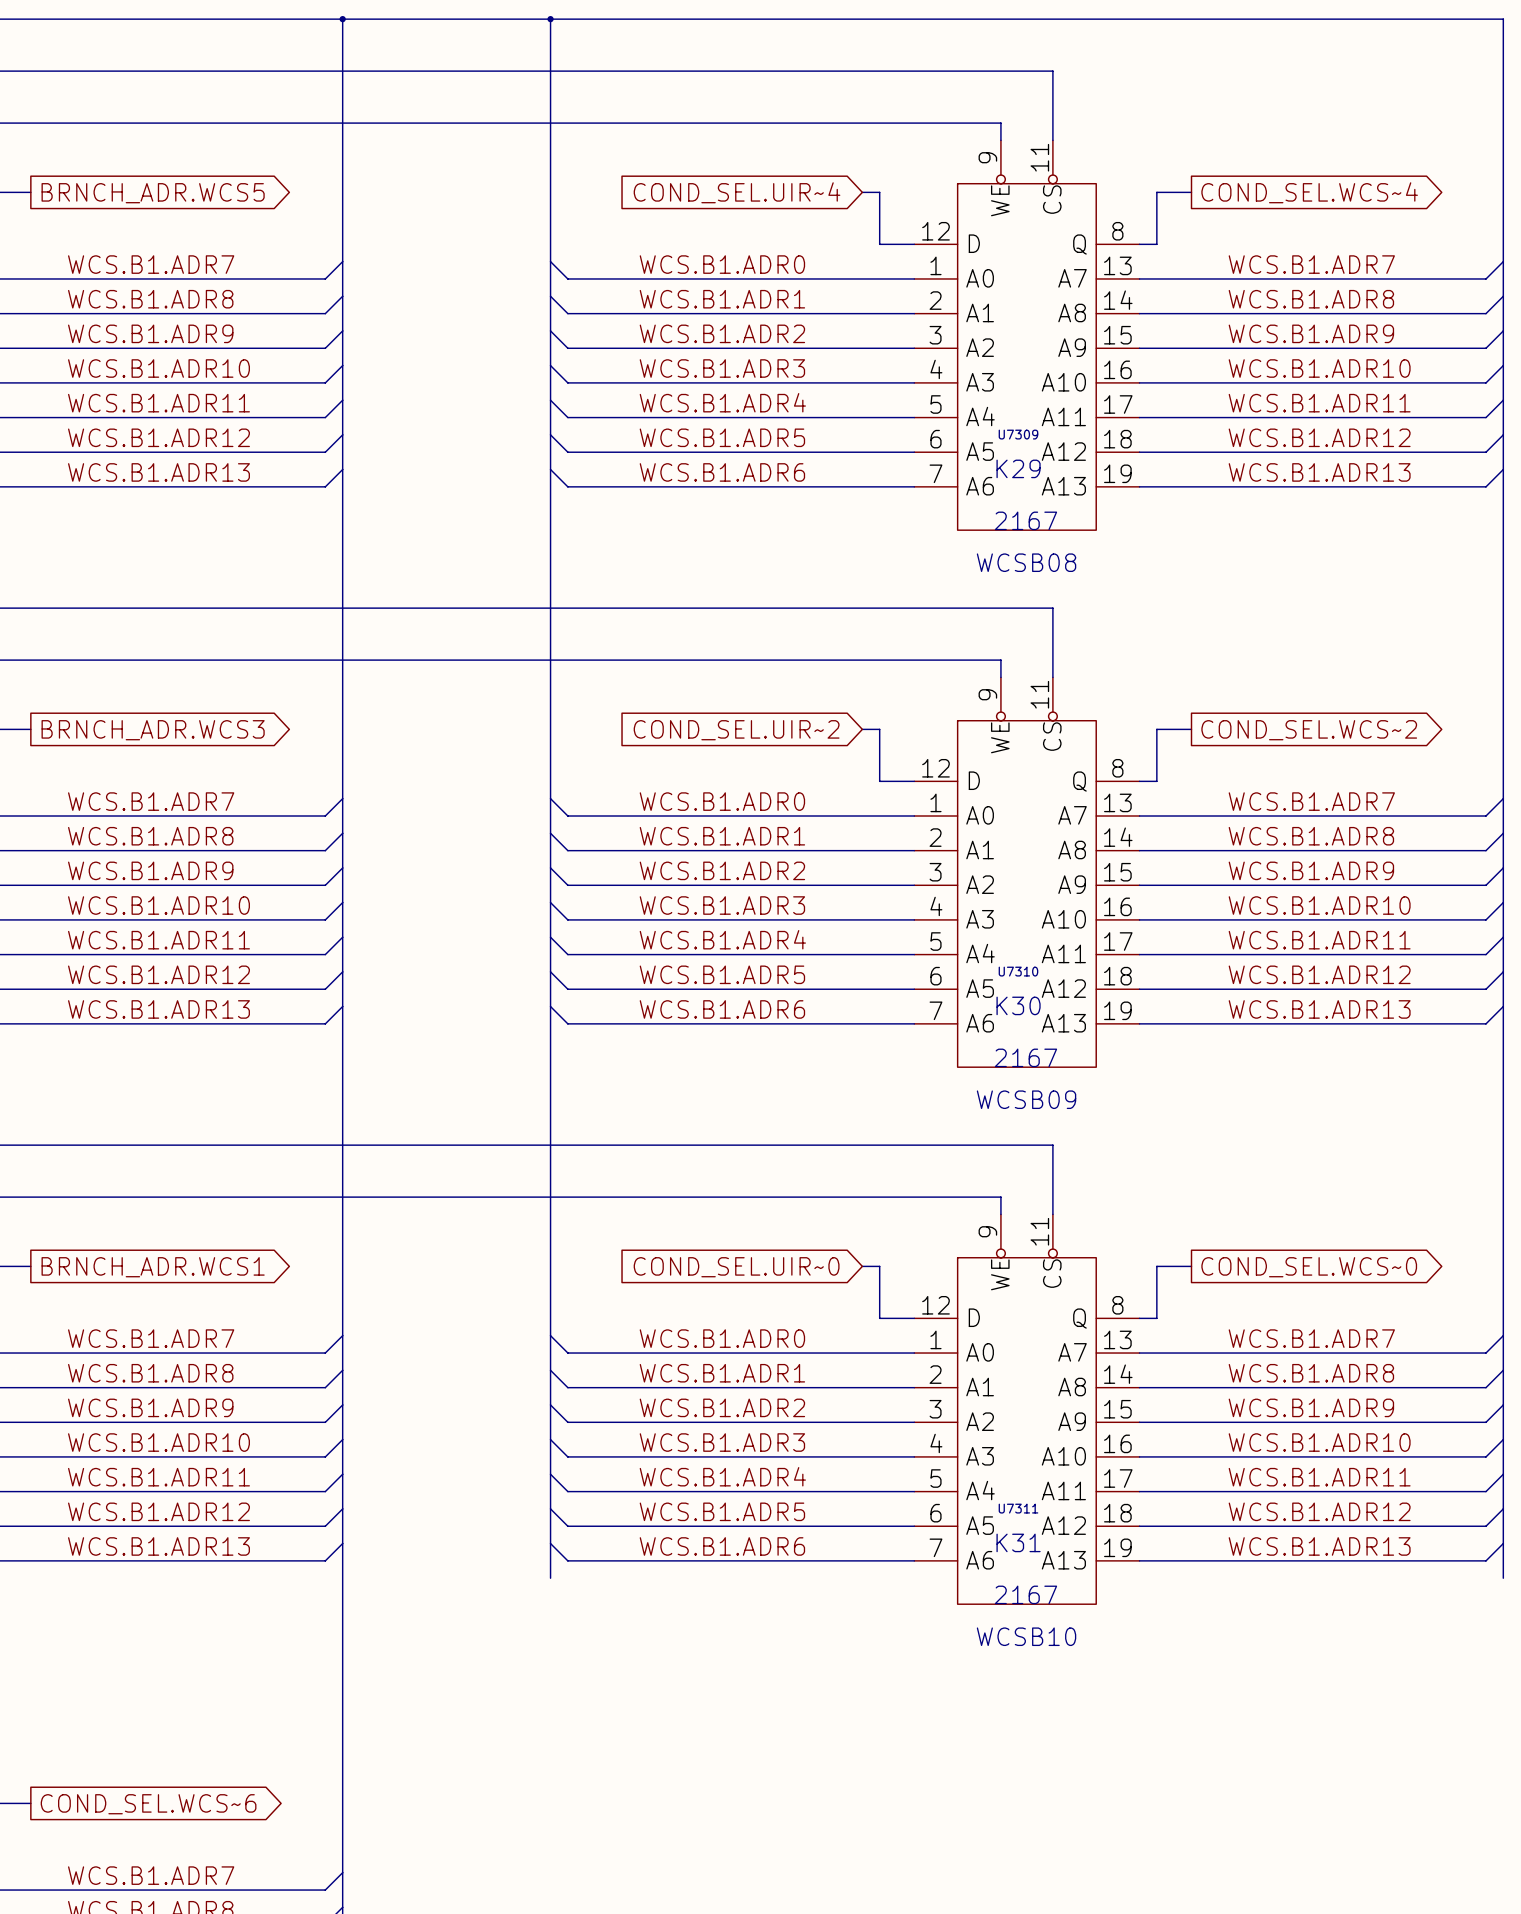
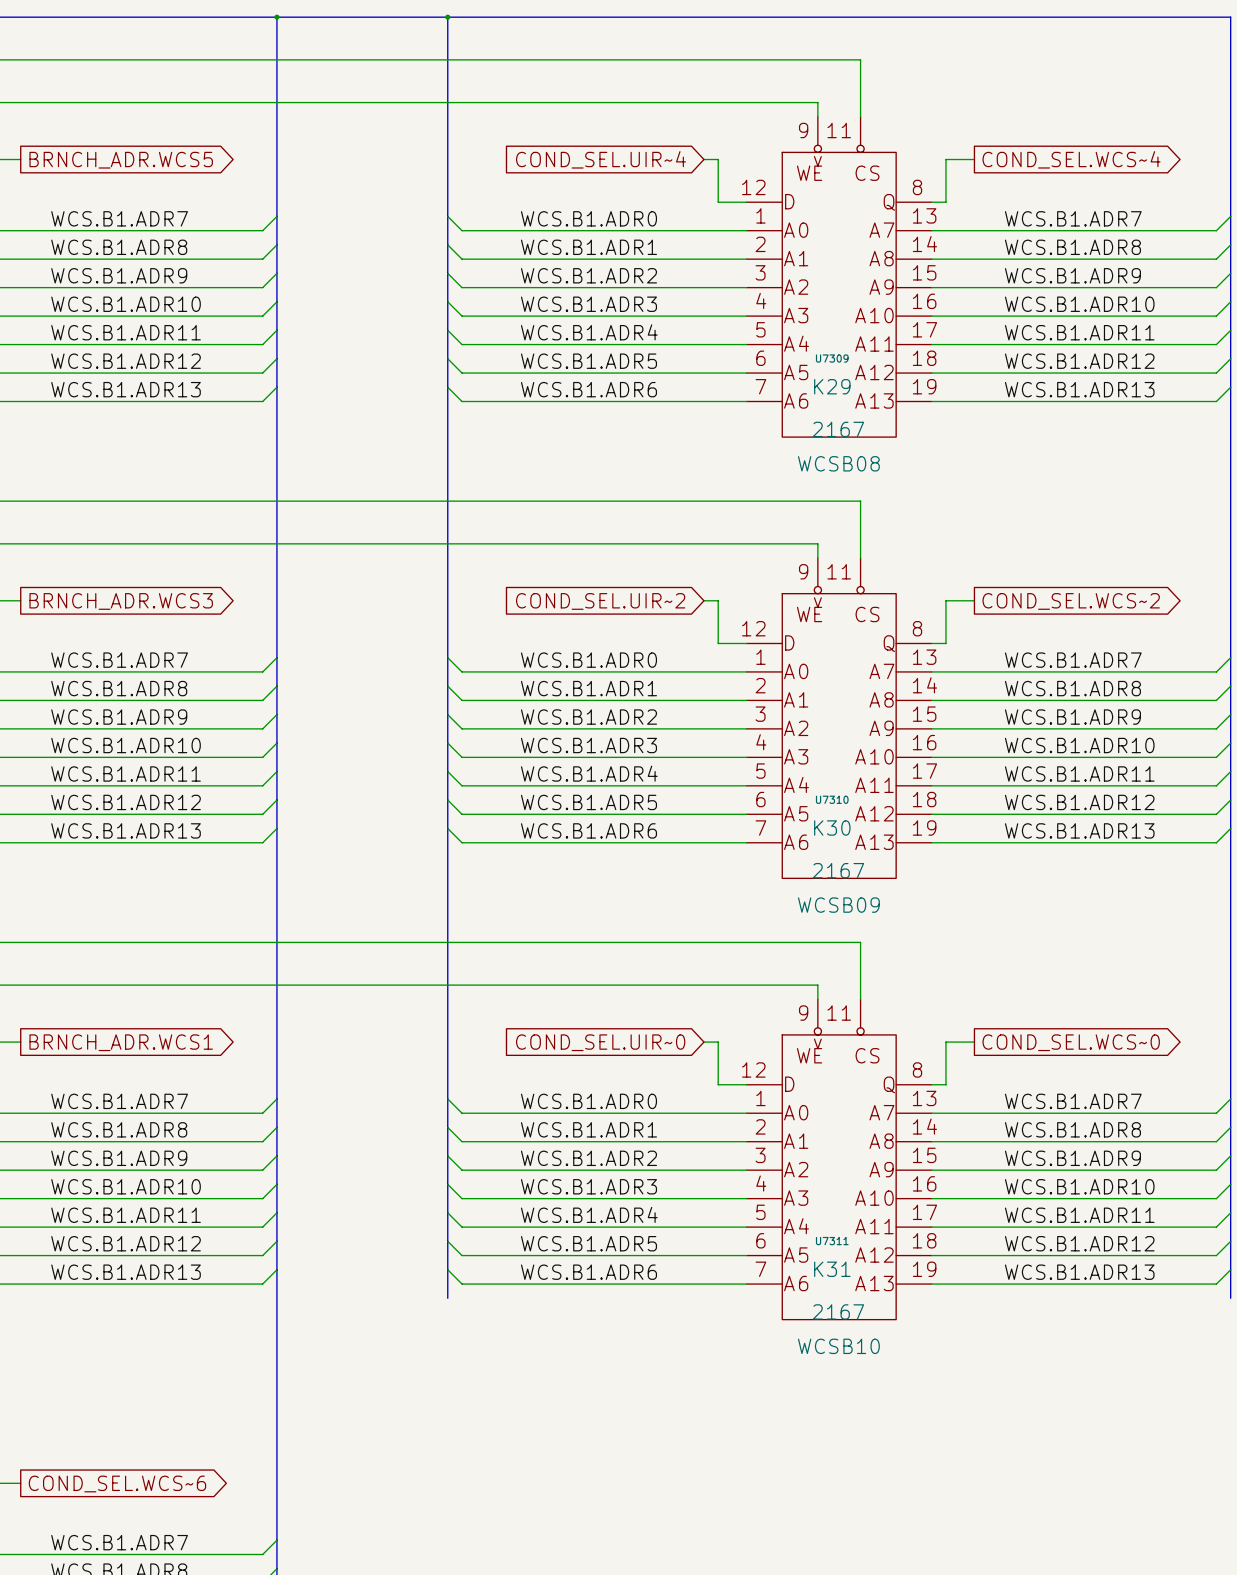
U7309 symbol: [914, 140, 1140, 531] -> [746, 116, 932, 438]
U7310 symbol: [914, 677, 1140, 1068] -> [746, 558, 932, 879]
U7311 symbol: [914, 1214, 1140, 1605] -> [746, 999, 932, 1320]

